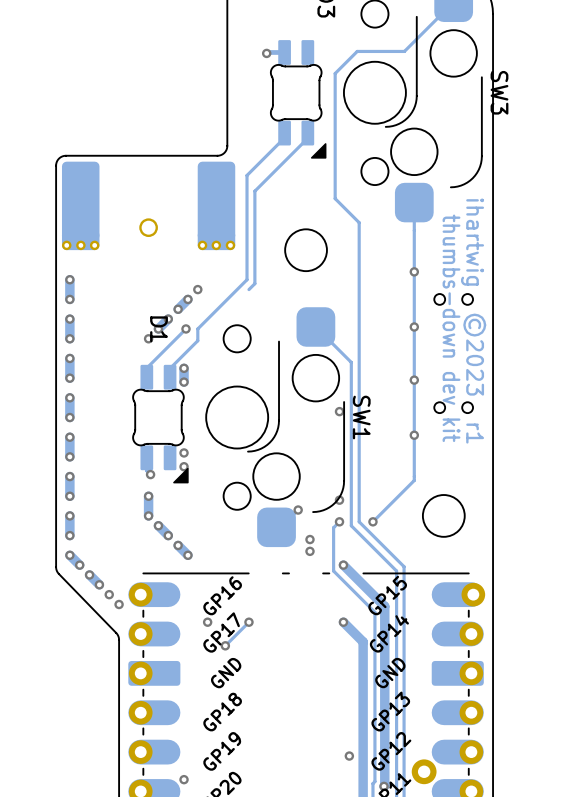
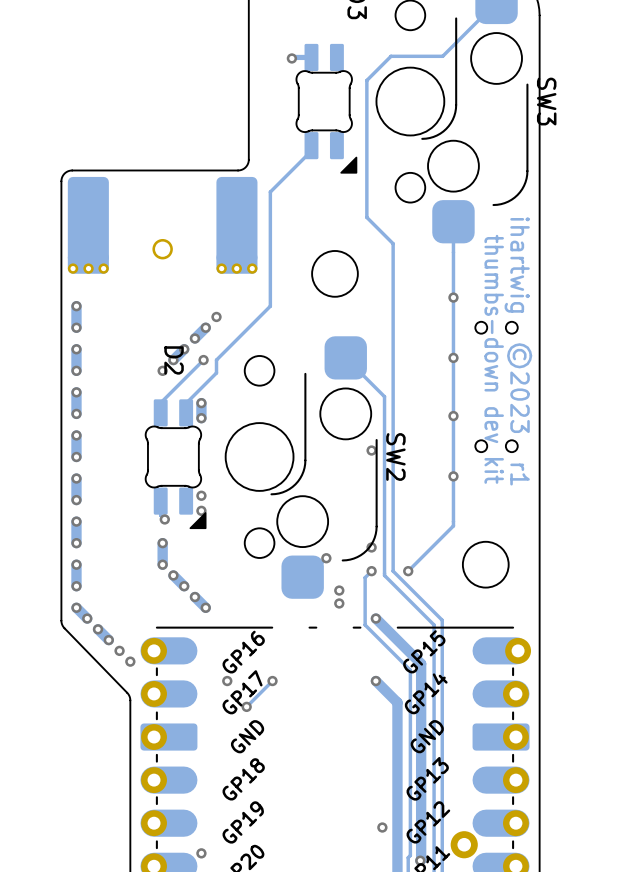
track: (307, 138) (254, 191) (254, 283) (248, 289) -> none
D1 name: D1 (159, 329) -> D2 (174, 360)
SW1 name: SW1 (361, 417) -> SW2 (395, 456)

